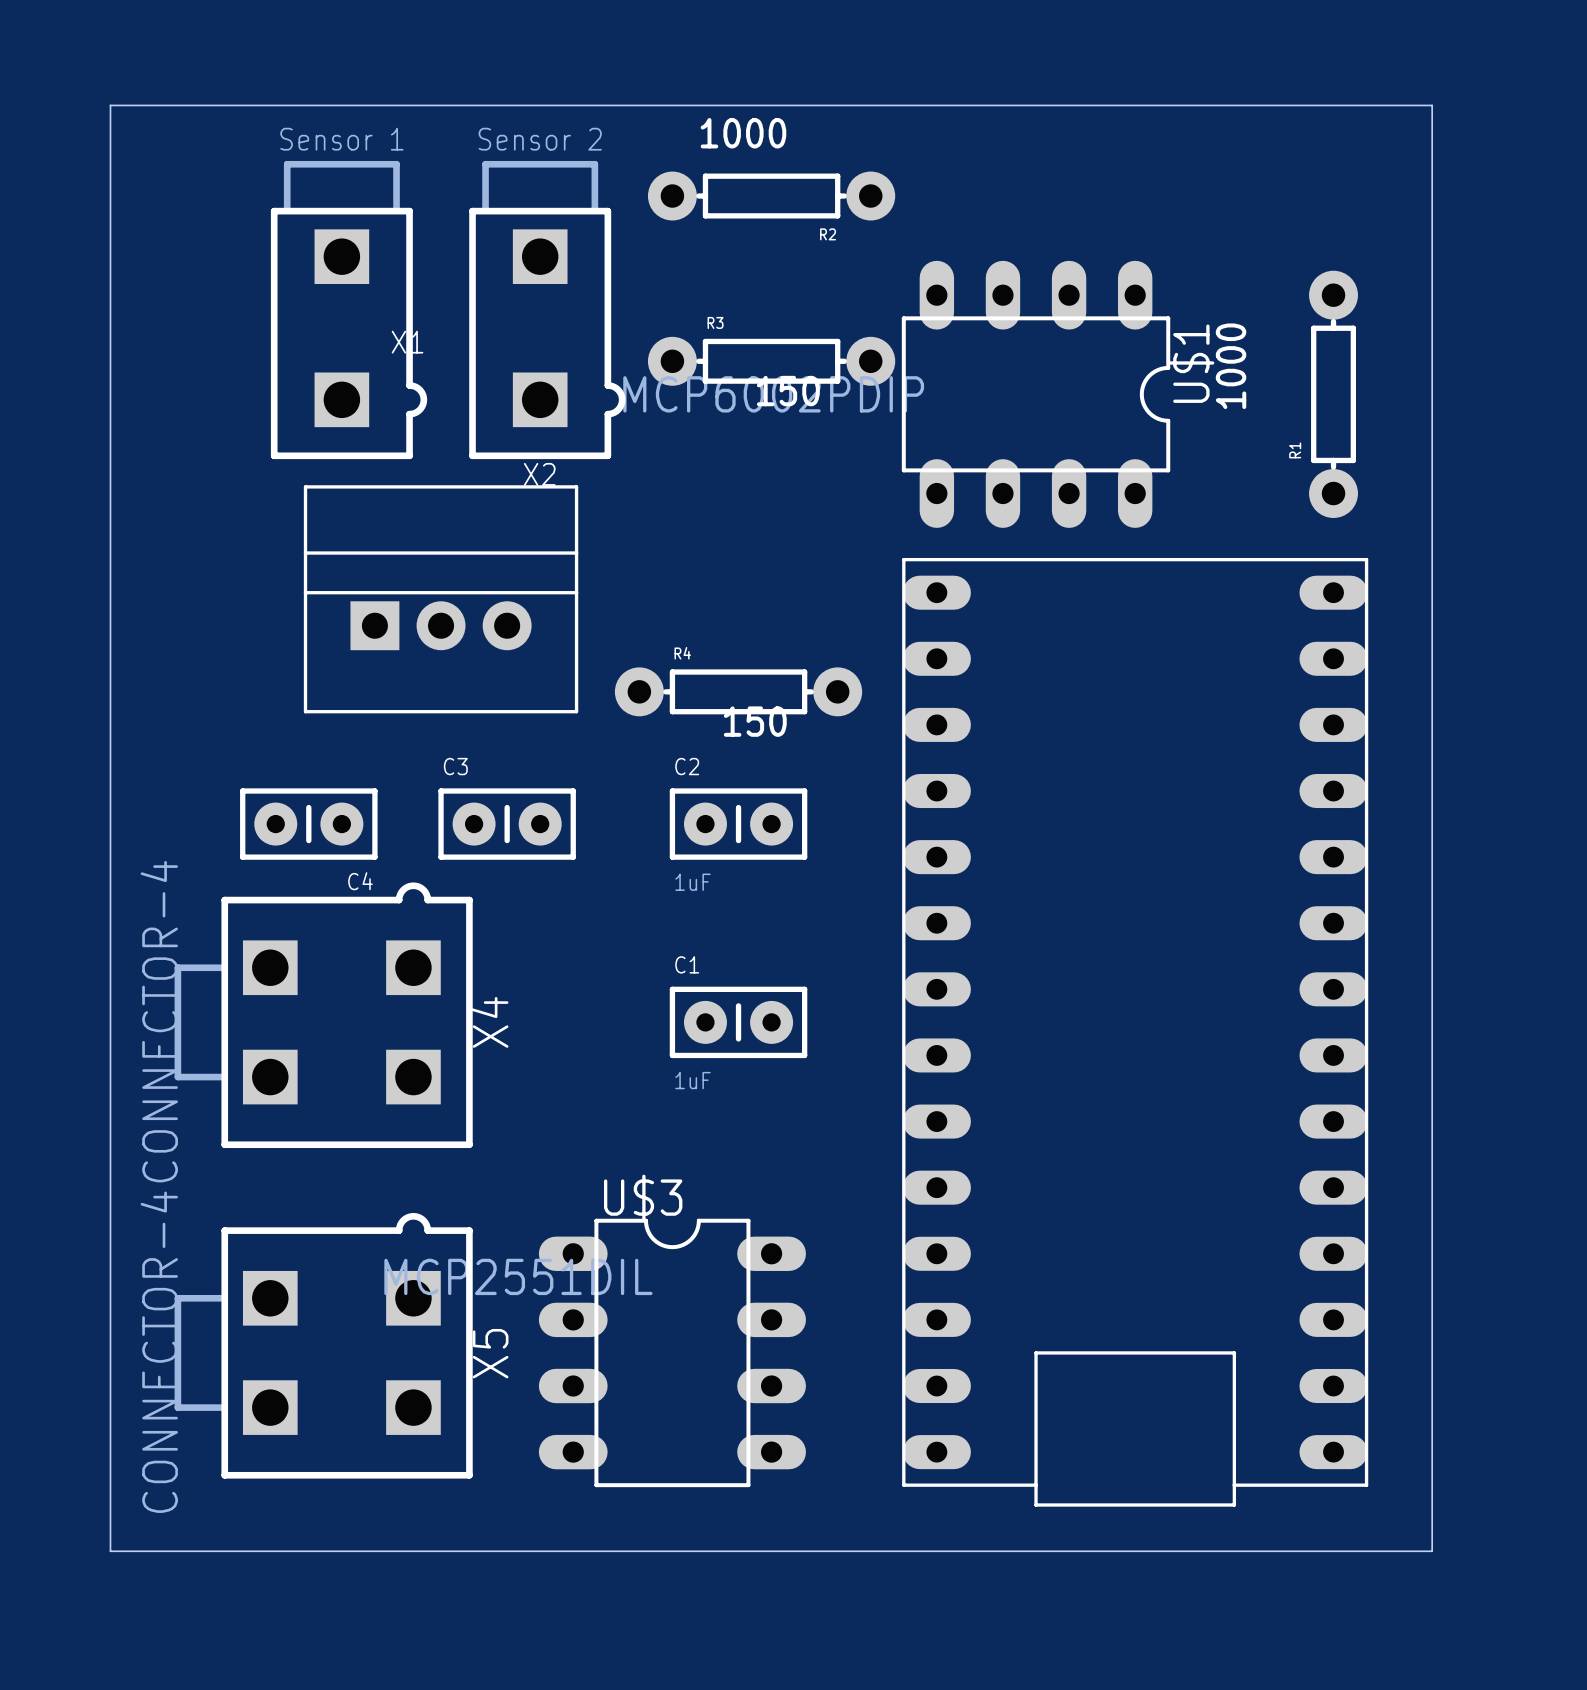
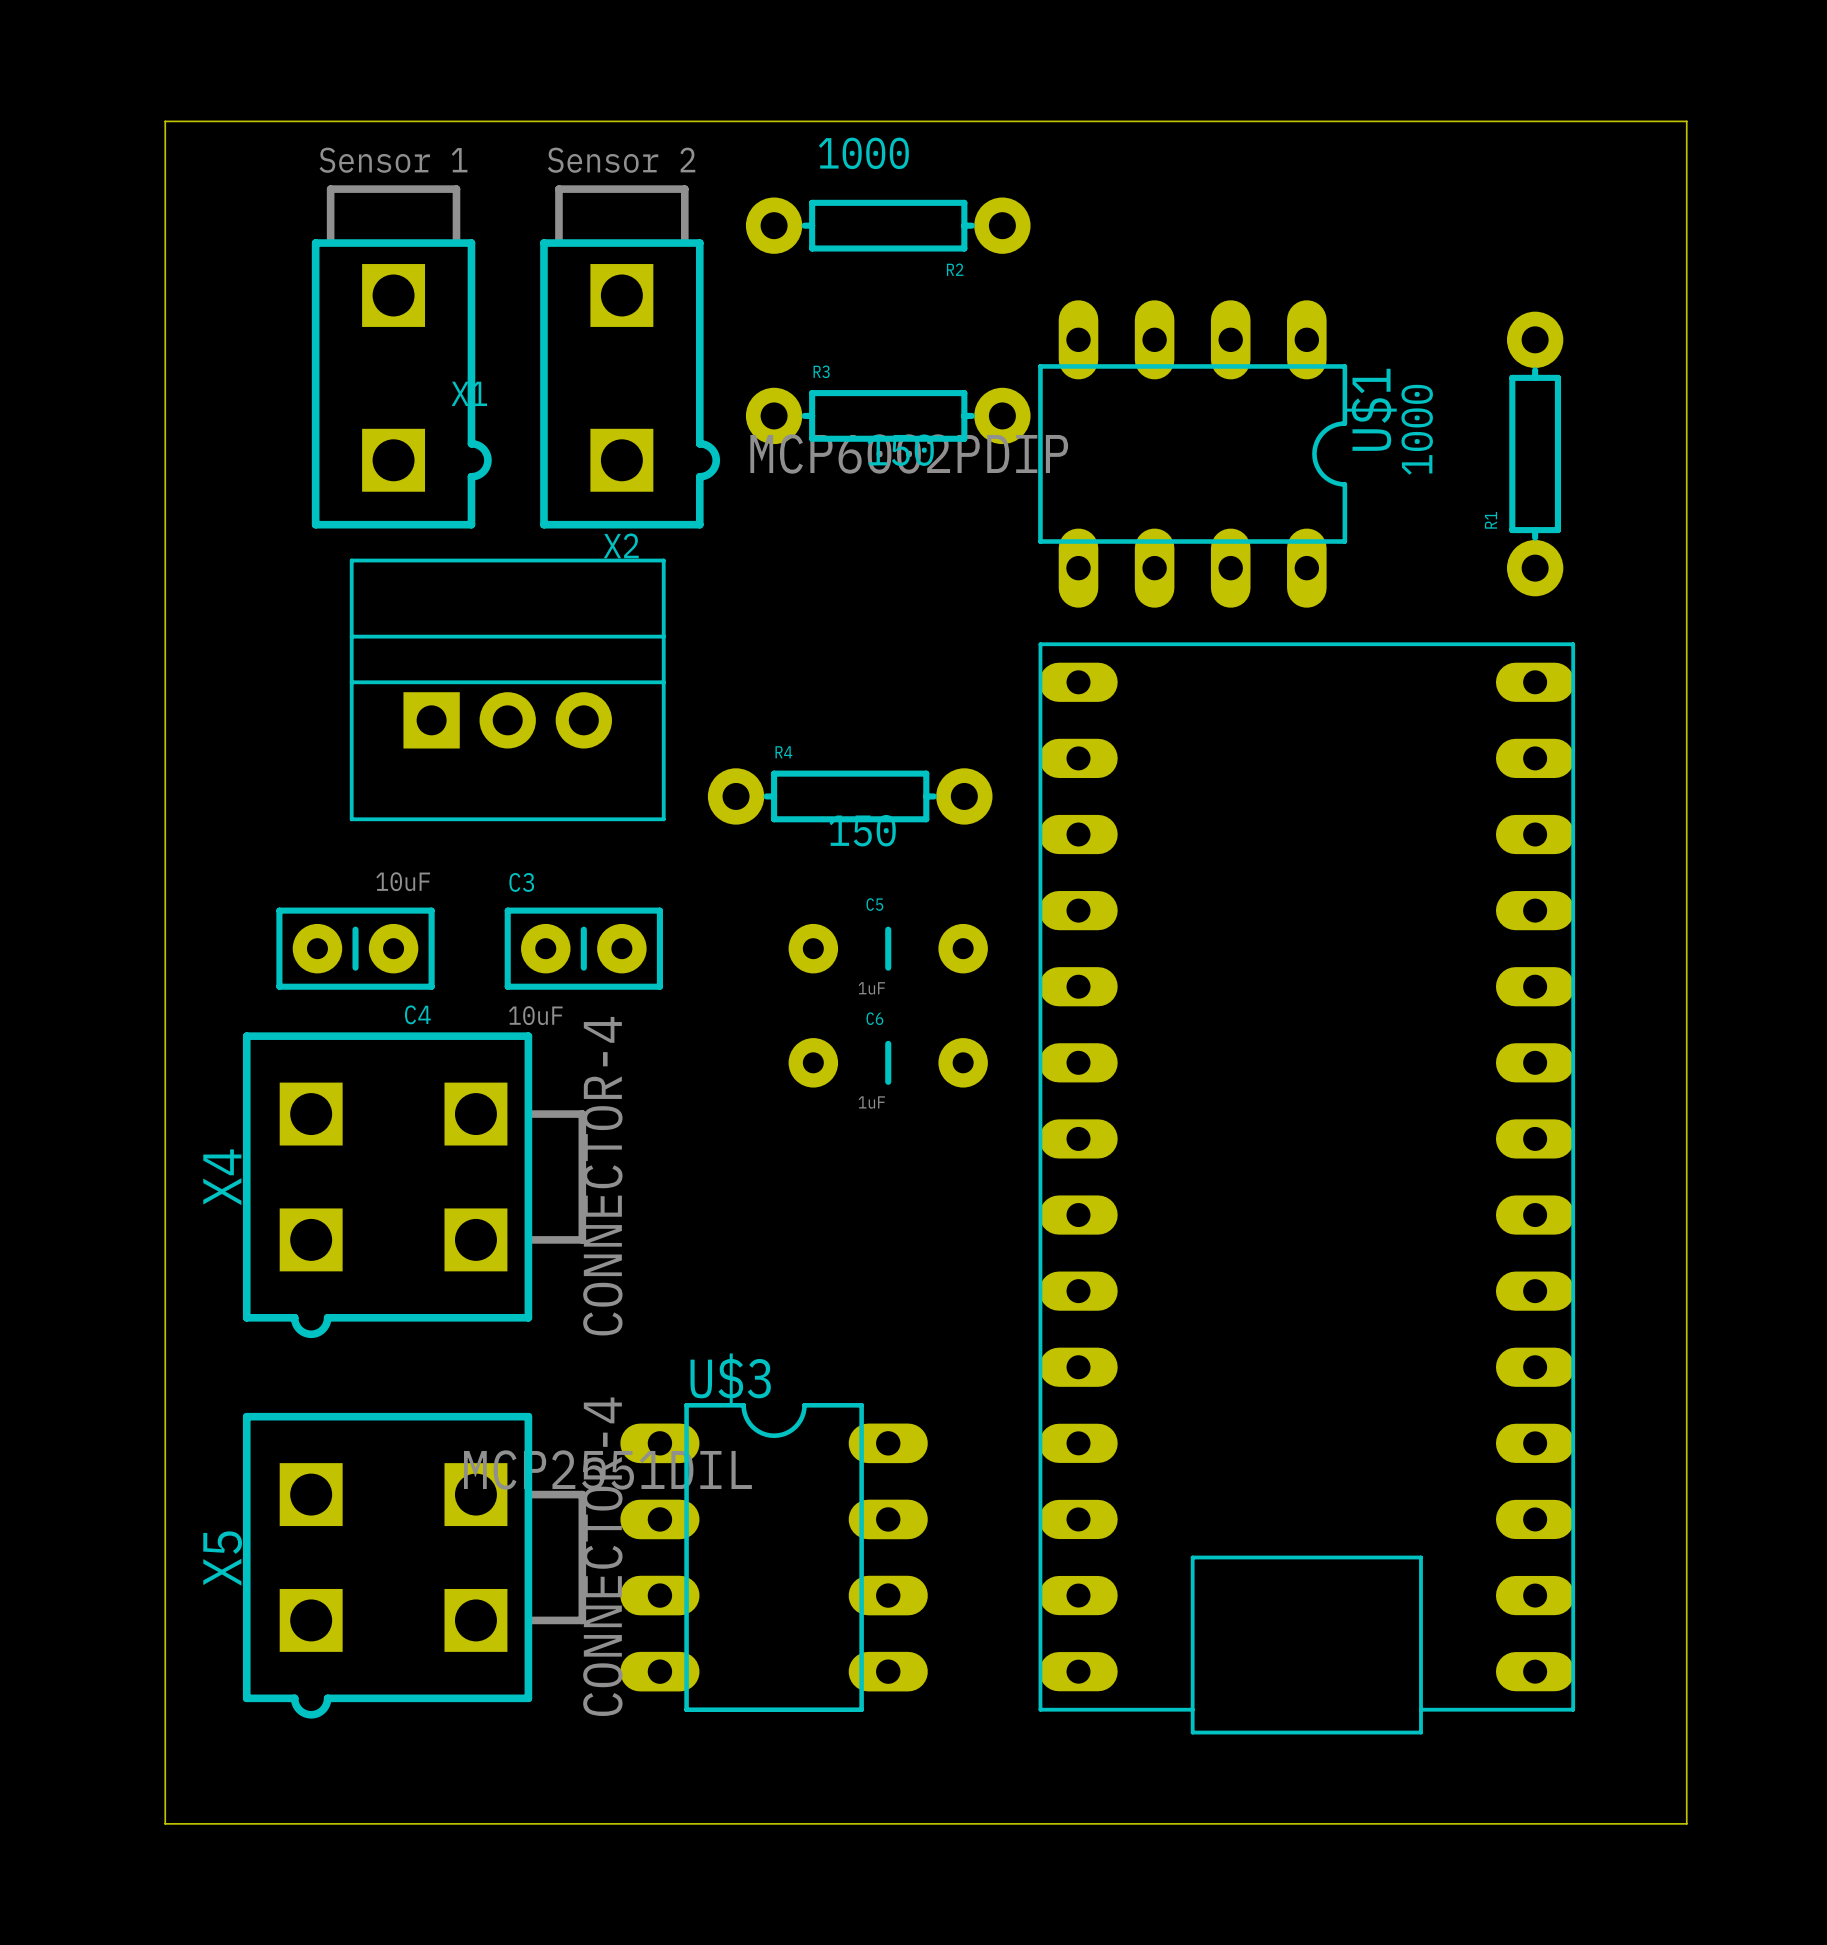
board edge: (143, 105) (110, 105) (110, 1551) (1432, 1551) (1432, 105) -> (165, 121) (165, 1823) (1686, 1823) (1686, 121) (1648, 121)
C4 value: none -> 10uF (403, 881)
C2: 1uF (738, 824) -> none
C5: none -> 1uF (888, 948)
C3 value: none -> 10uF (535, 1015)
C6: none -> 1uF (888, 1062)
X4 rotation: 0° (323, 1015) -> 180° (414, 1185)
C1: 1uF (738, 1022) -> none
X5 rotation: 0° (323, 1345) -> 180° (414, 1565)

